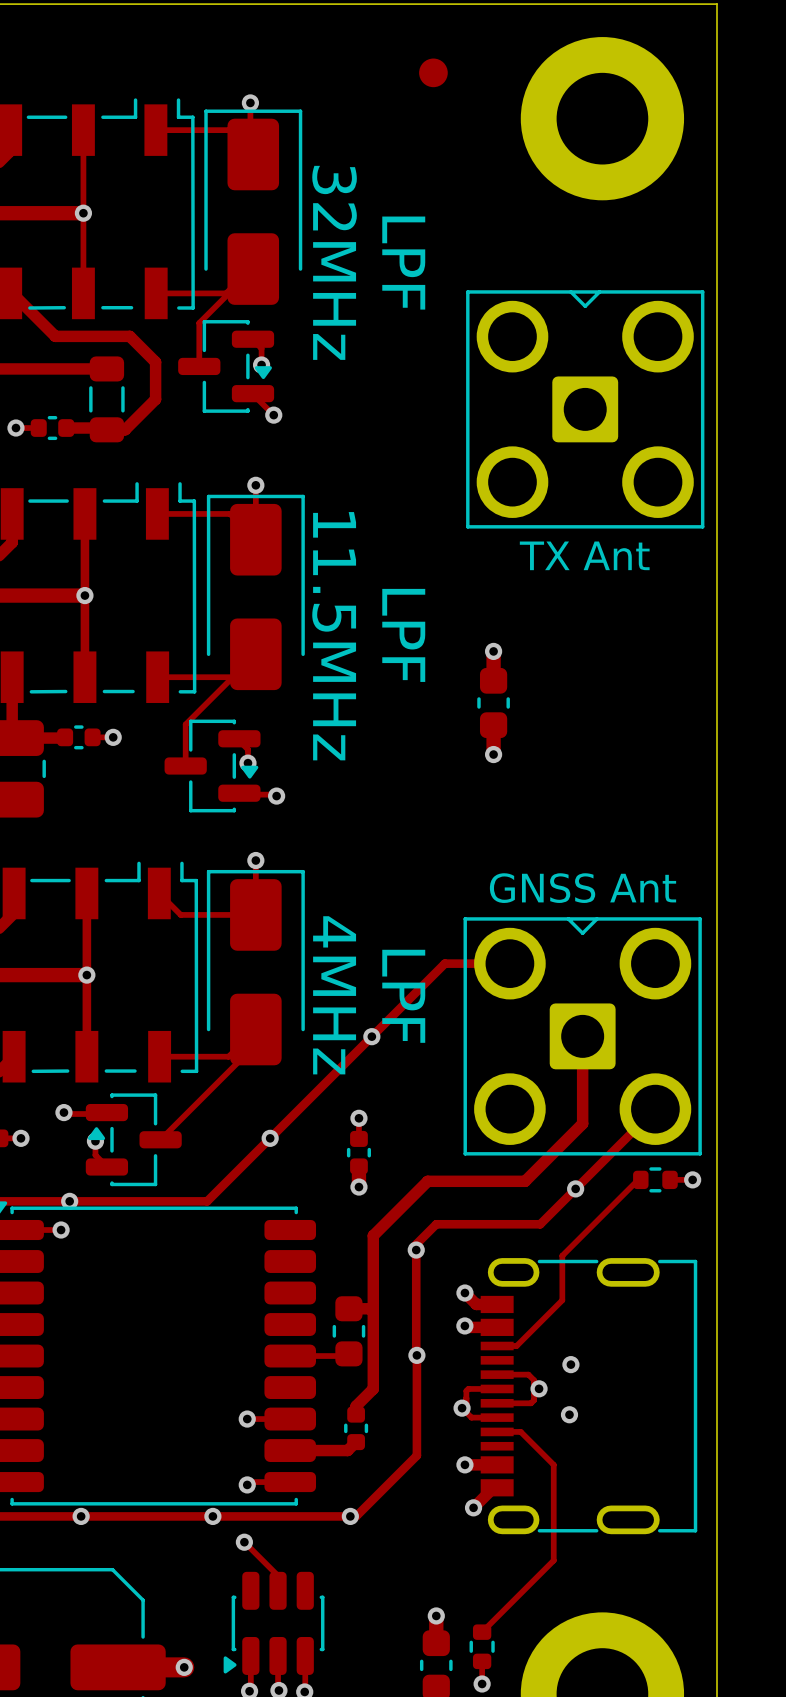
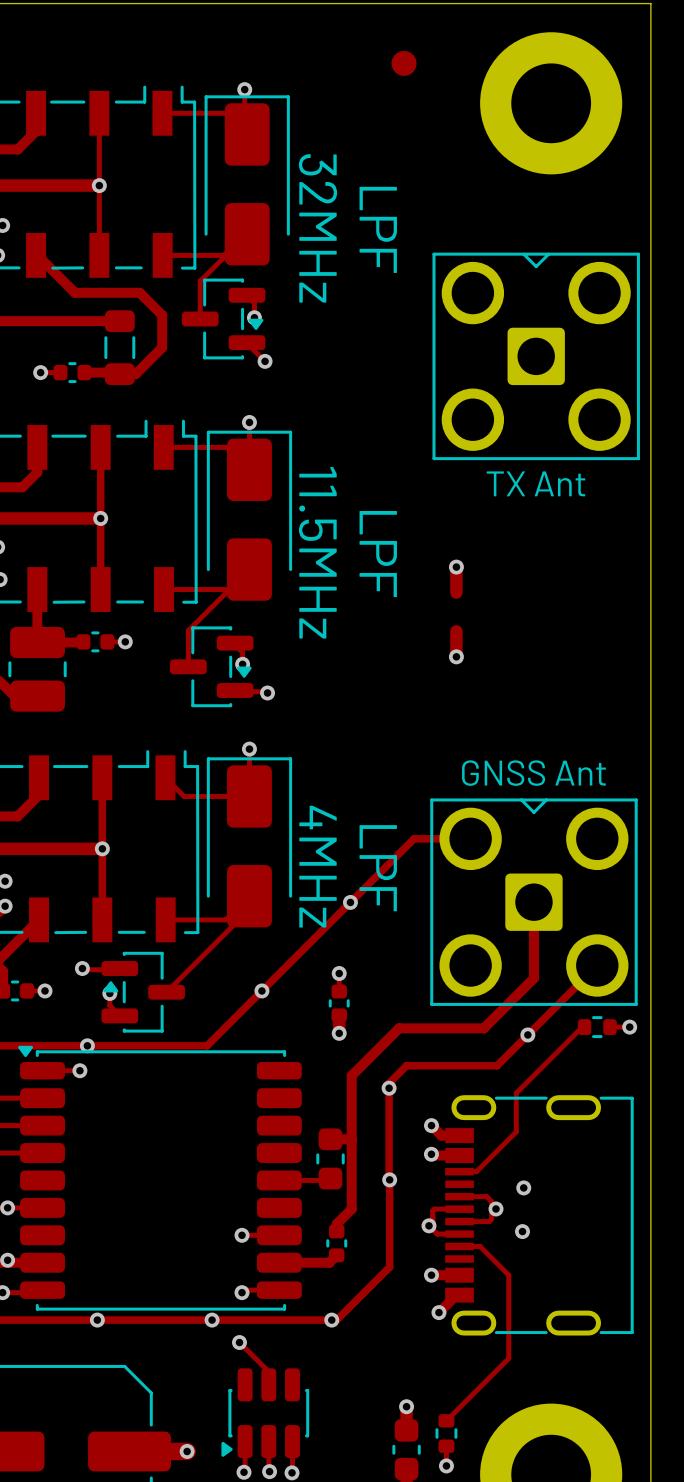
part: (493, 702) -> none

